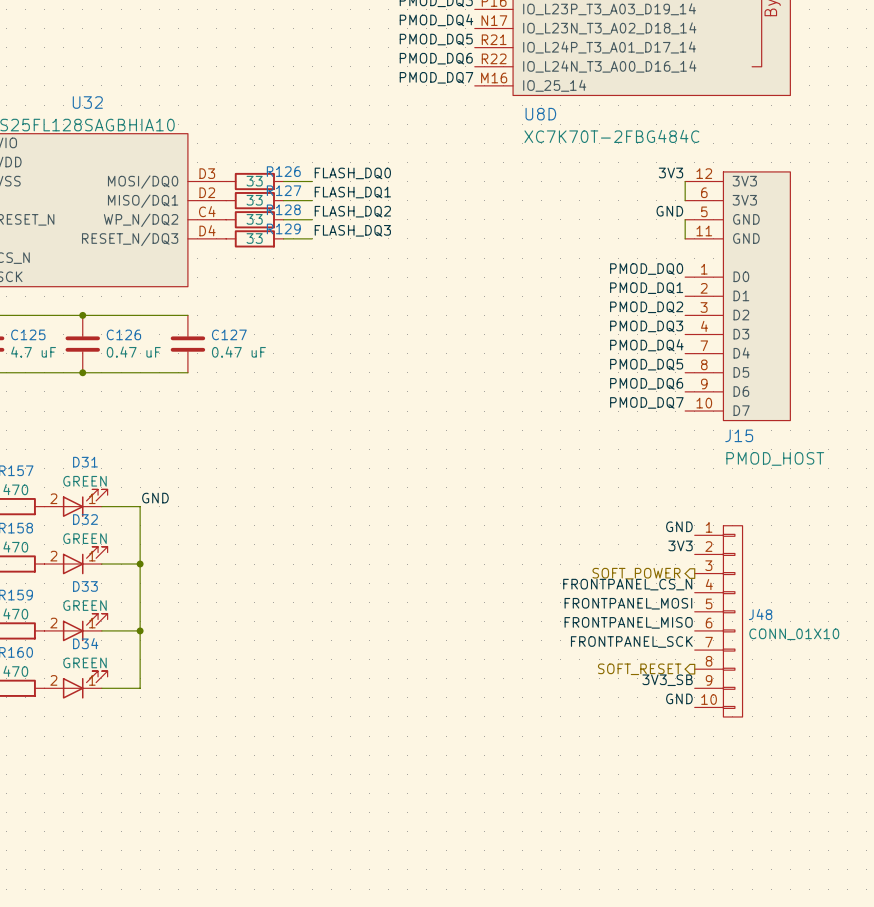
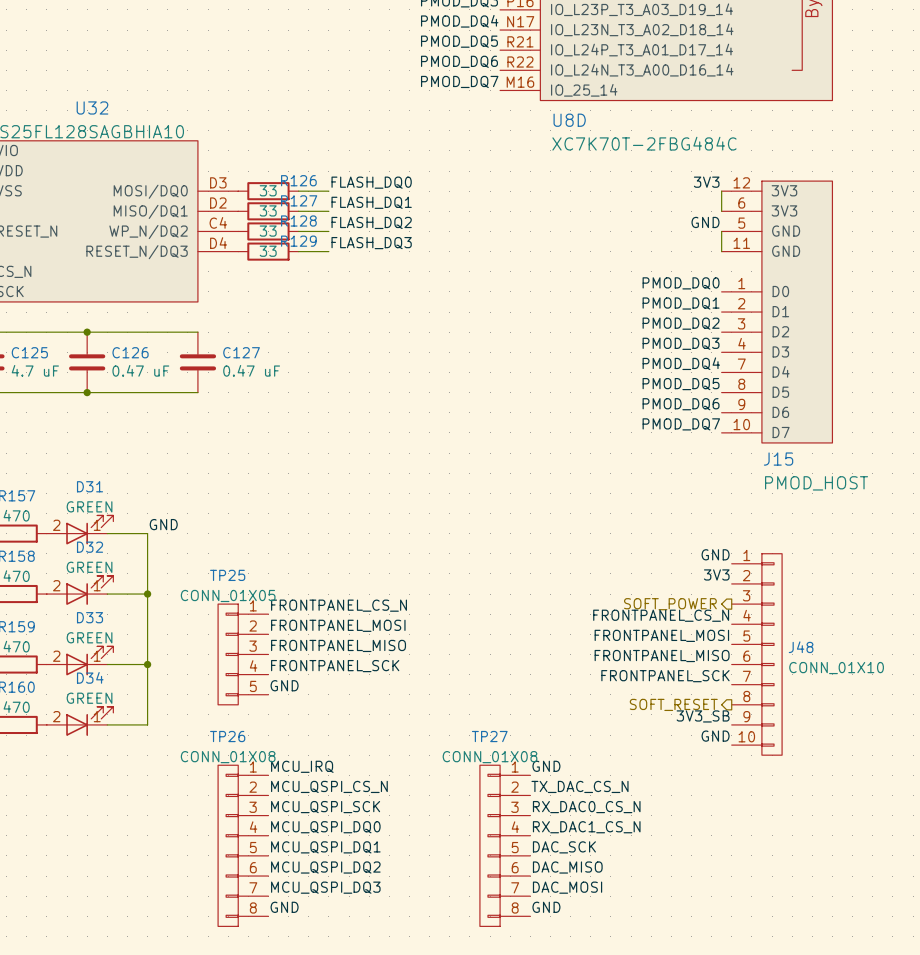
label: none -> FRONTPANEL_CS_N (339, 605)
label: none -> FRONTPANEL_MOSI (338, 625)
label: none -> FRONTPANEL_MISO (338, 645)
TP25: none -> CONN_01X05 (243, 654)
label: none -> FRONTPANEL_SCK (335, 666)
label: none -> GND (284, 685)
label: none -> GND (546, 766)
label: none -> MCU_IRQ (302, 766)
label: none -> MCU_QSPI_CS_N (329, 786)
label: none -> TX_DAC_CS_N (580, 786)
label: none -> MCU_QSPI_SCK (325, 807)
label: none -> RX_DAC0_CS_N (586, 807)
label: none -> MCU_QSPI_DQ0 (325, 827)
label: none -> RX_DAC1_CS_N (586, 827)
TP26: none -> CONN_01X08 (243, 845)
TP27: none -> CONN_01X08 (505, 845)
label: none -> MCU_QSPI_DQ1 (325, 847)
label: none -> DAC_SCK (564, 847)
label: none -> MCU_QSPI_DQ2 (325, 867)
label: none -> DAC_MISO (567, 867)
label: none -> MCU_QSPI_DQ3 (325, 887)
label: none -> DAC_MOSI (567, 887)
label: none -> GND (284, 907)
label: none -> GND (546, 907)

